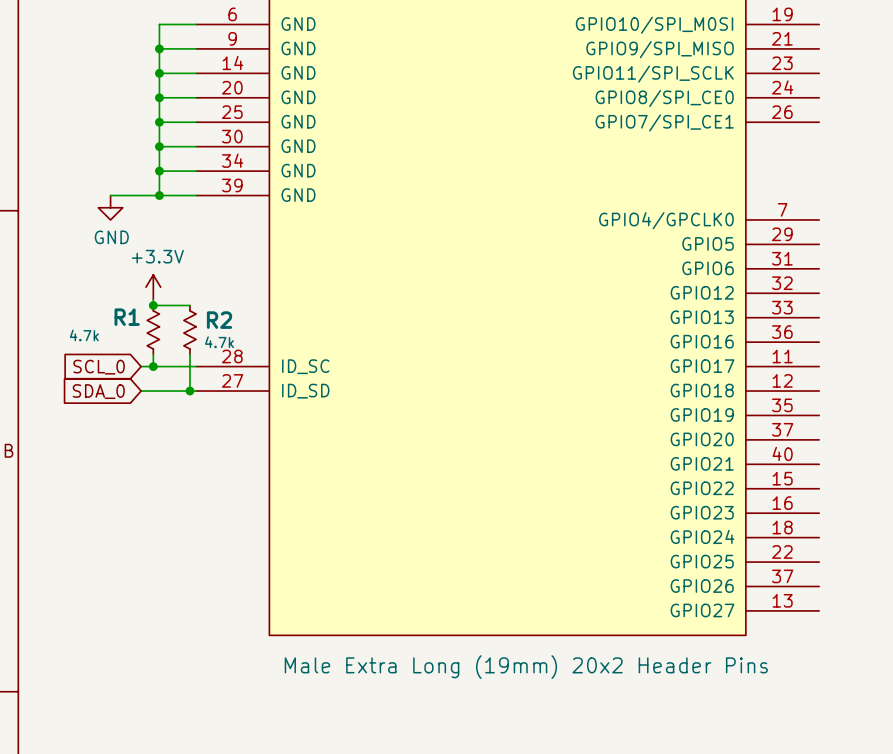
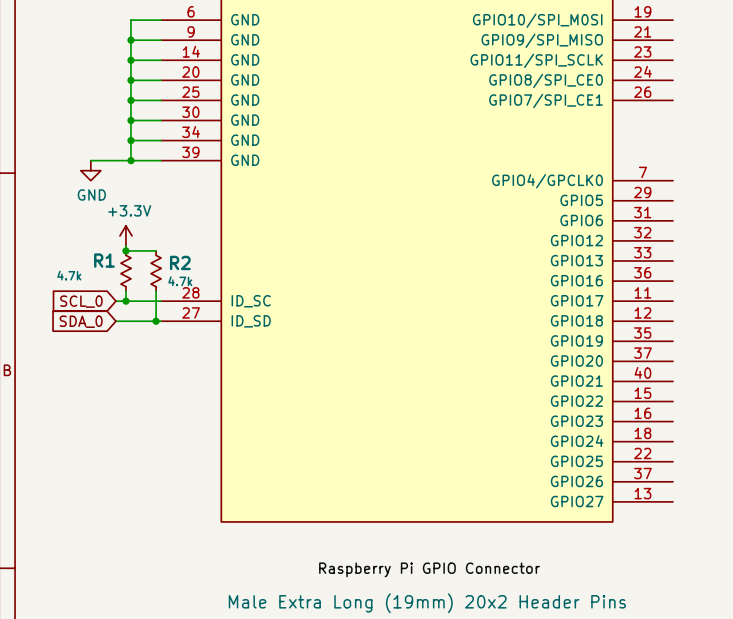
part value position: Male Extra Long (19mm) 20x2 Header Pins (526, 667) -> Male Extra Long (19mm) 20x2 Header Pins (427, 603)
label: none -> Raspberry Pi GPIO Connector (429, 569)

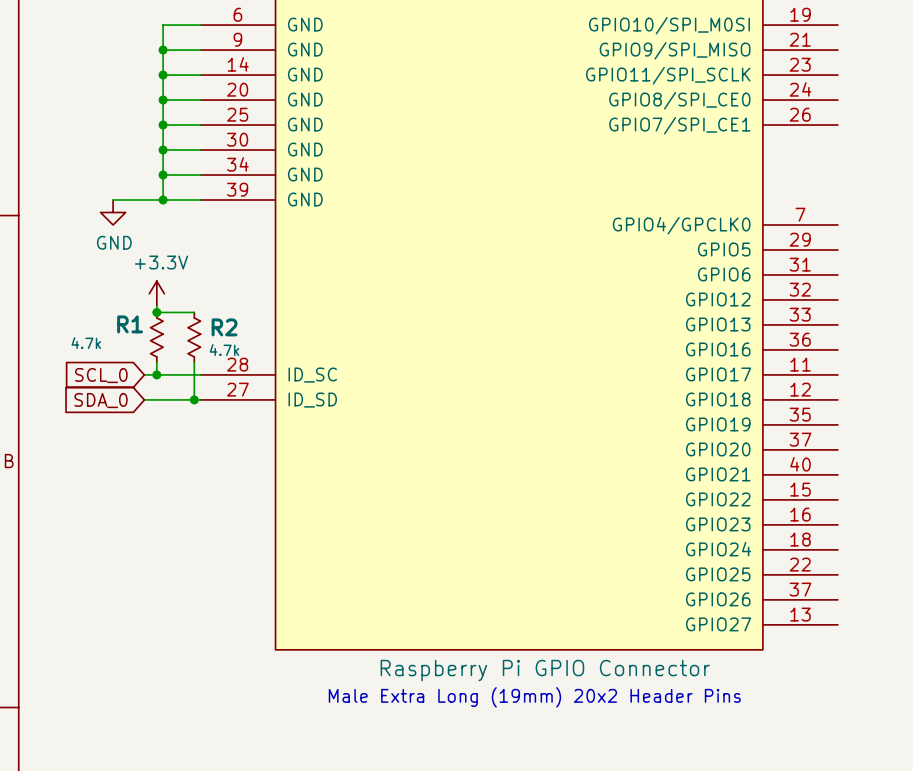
text: none -> Male Extra Long (19mm) 20x2 Header Pins (534, 697)
label: Raspberry Pi GPIO Connector (429, 569) -> none
part value: Male Extra Long (19mm) 20x2 Header Pins (427, 603) -> Raspberry Pi GPIO Connector (545, 670)

